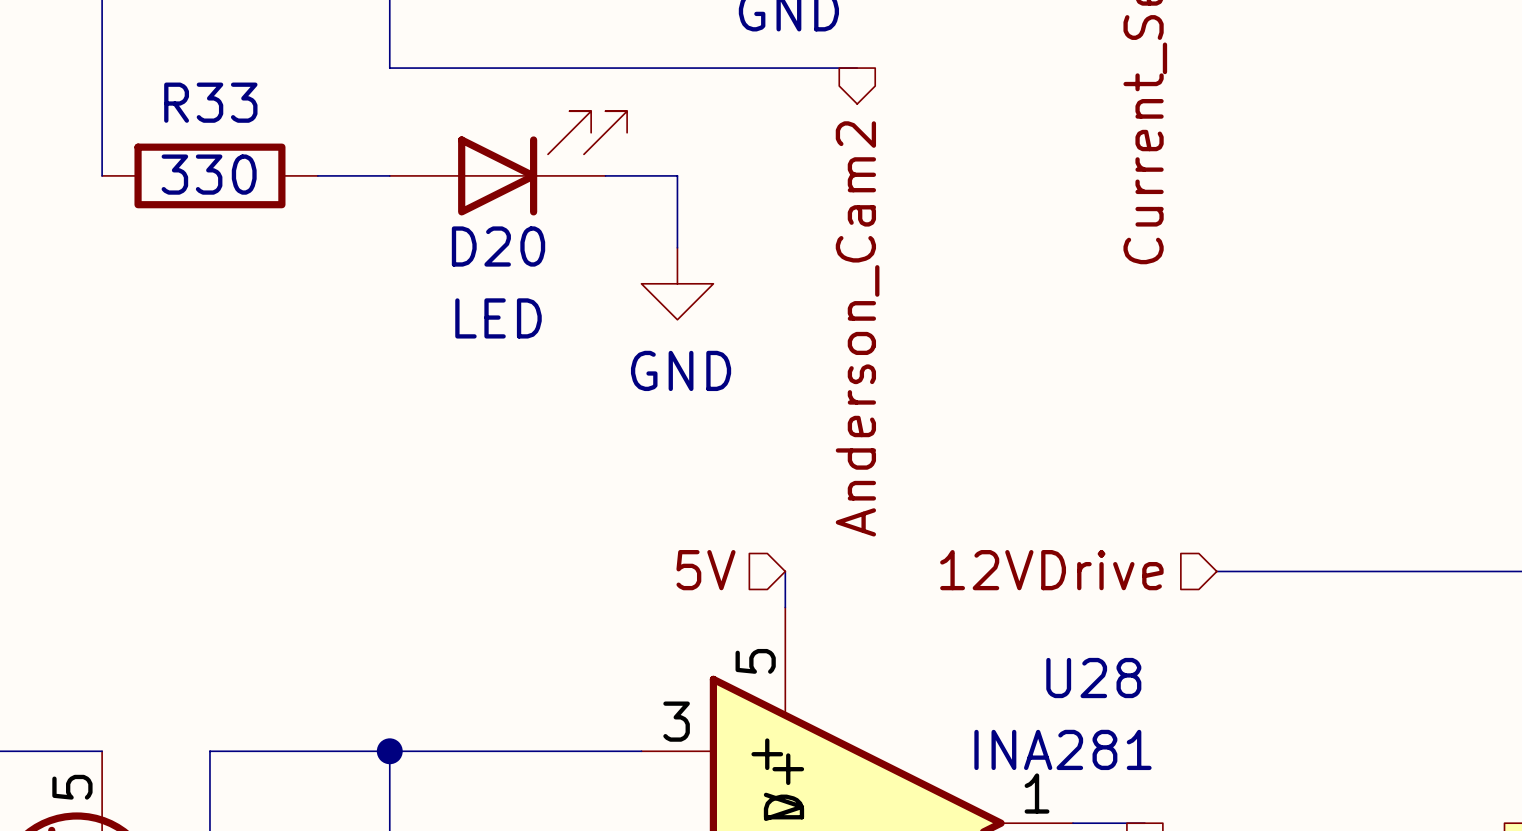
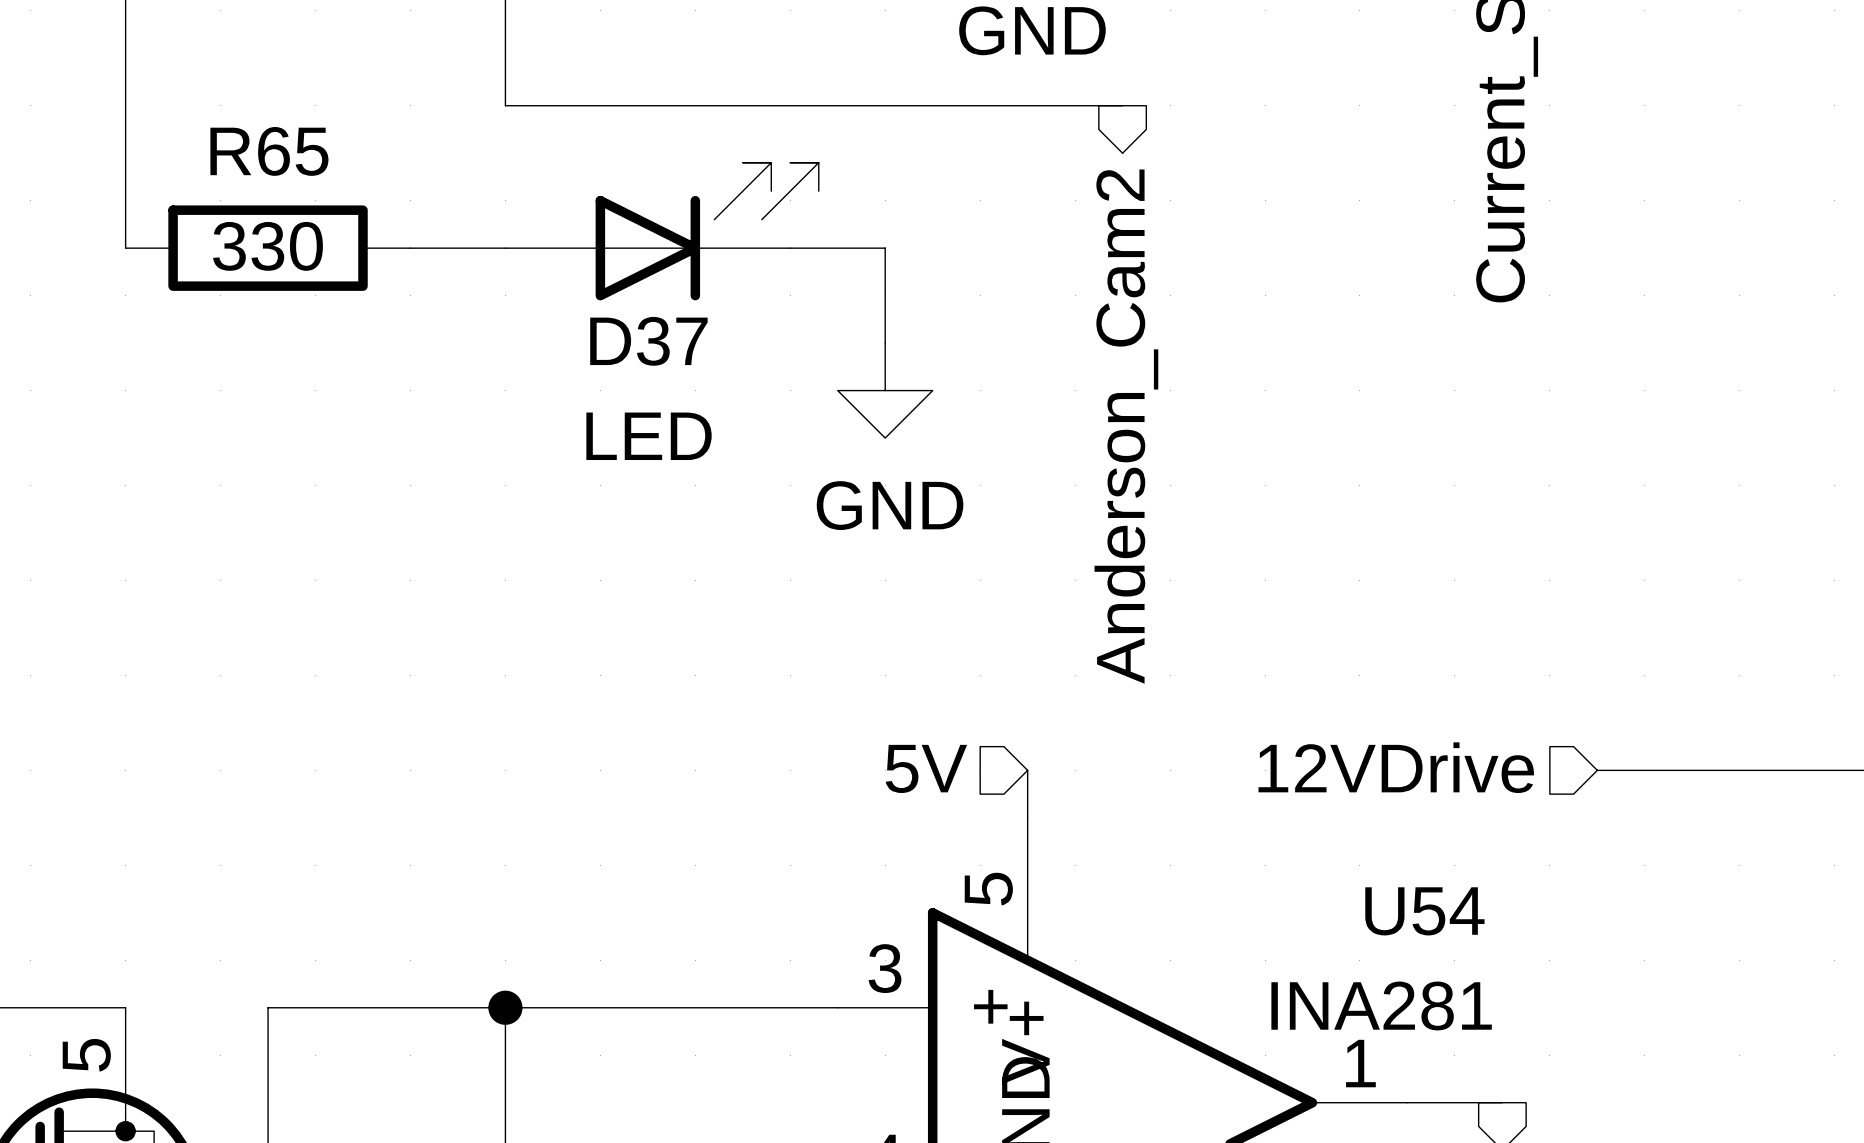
R33 name: R33 (210, 102) -> R65 (269, 151)
D20 name: D20 (498, 246) -> D37 (648, 341)
U28 name: U28 (1093, 678) -> U54 (1424, 911)

